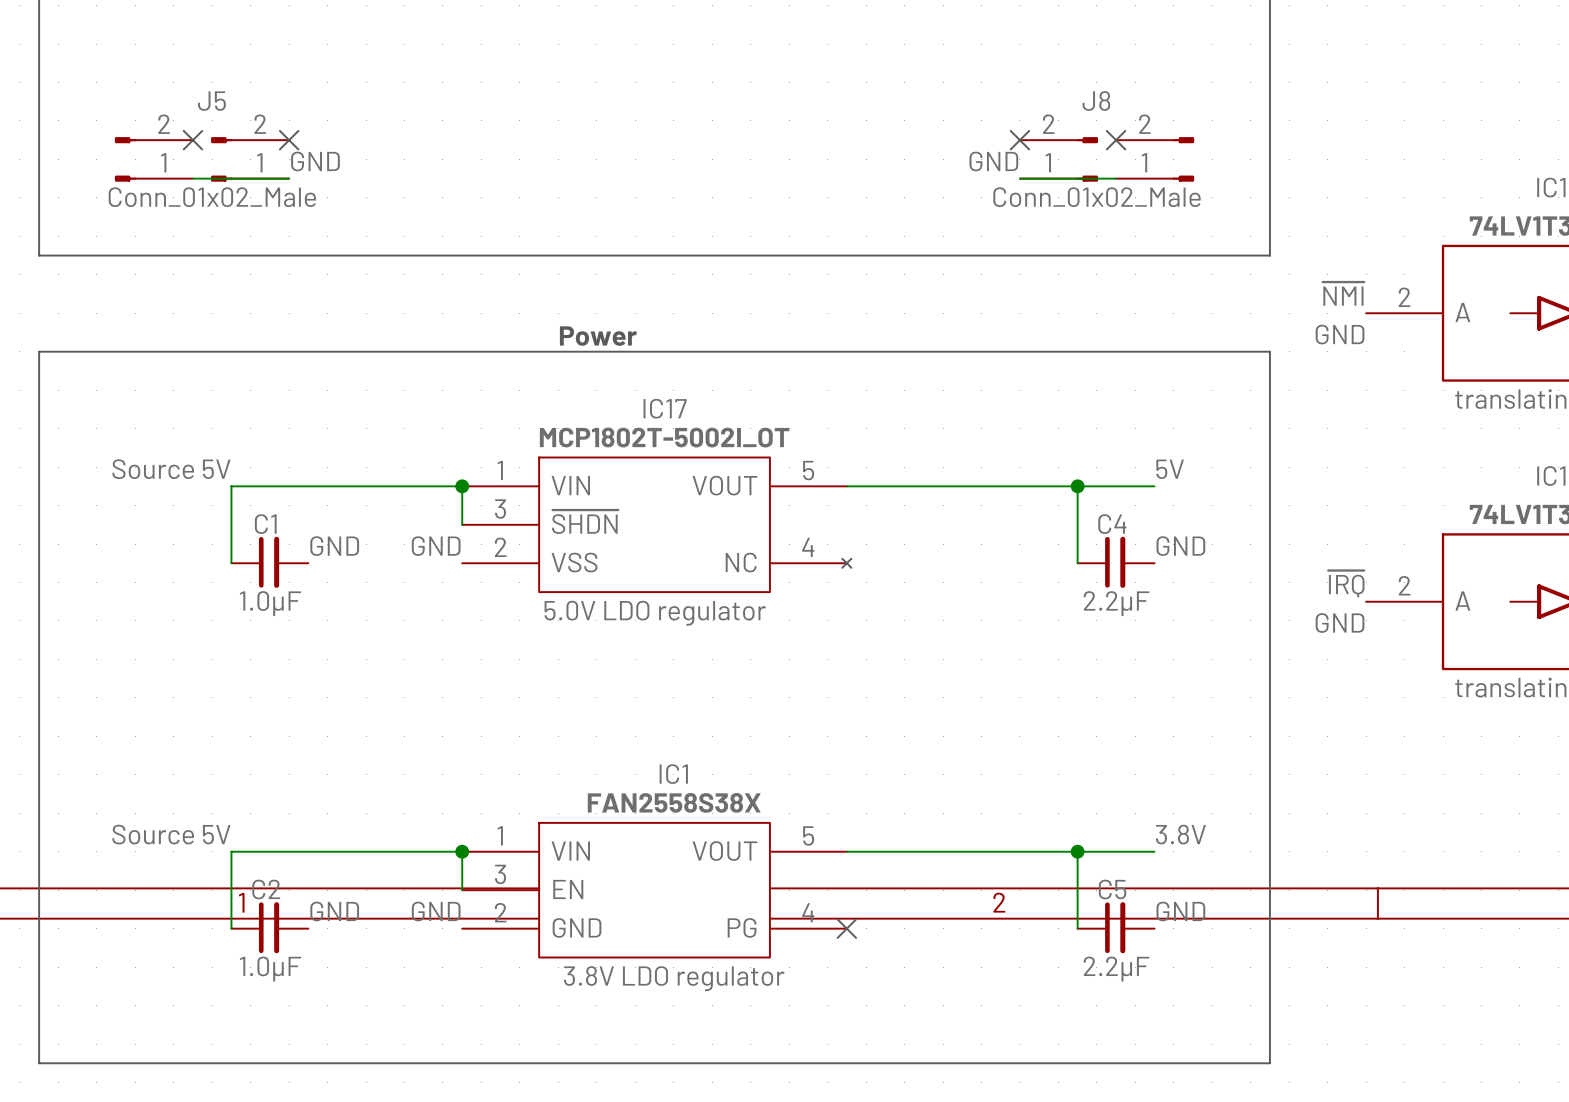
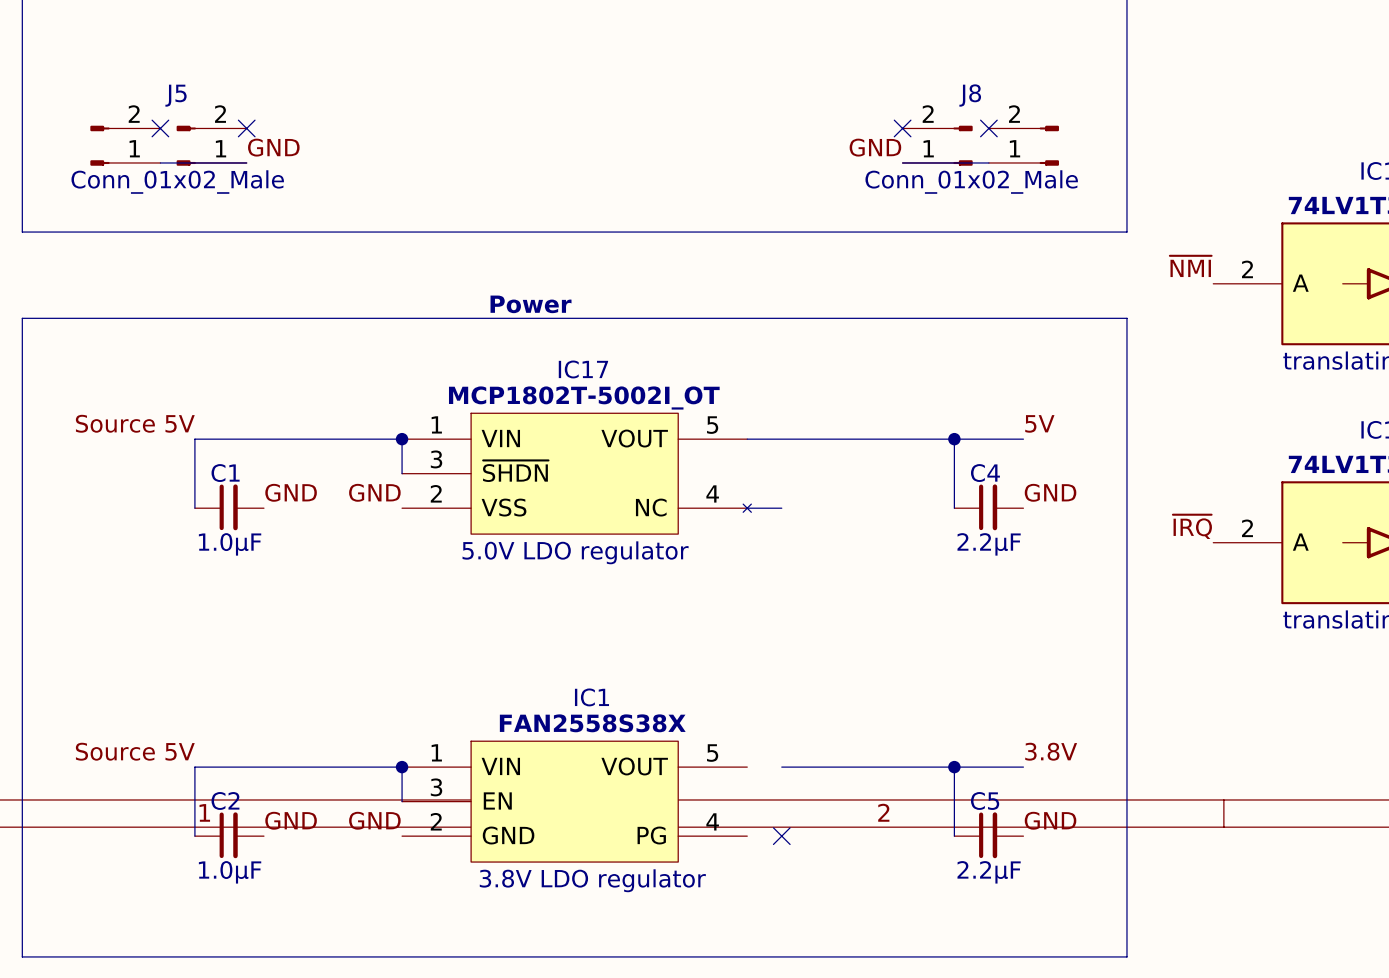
label: GND (1340, 334) -> none
label: GND (1340, 623) -> none
wire: (846, 851) (885, 851) -> (747, 508) (781, 508)
no-connect mark position: (846, 928) -> (781, 836)

